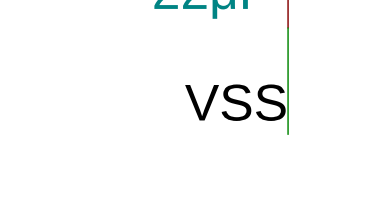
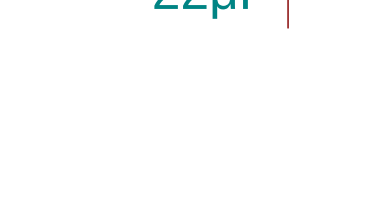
wire: (288, 27) (288, 134) -> none
label: VSS (235, 102) -> none

